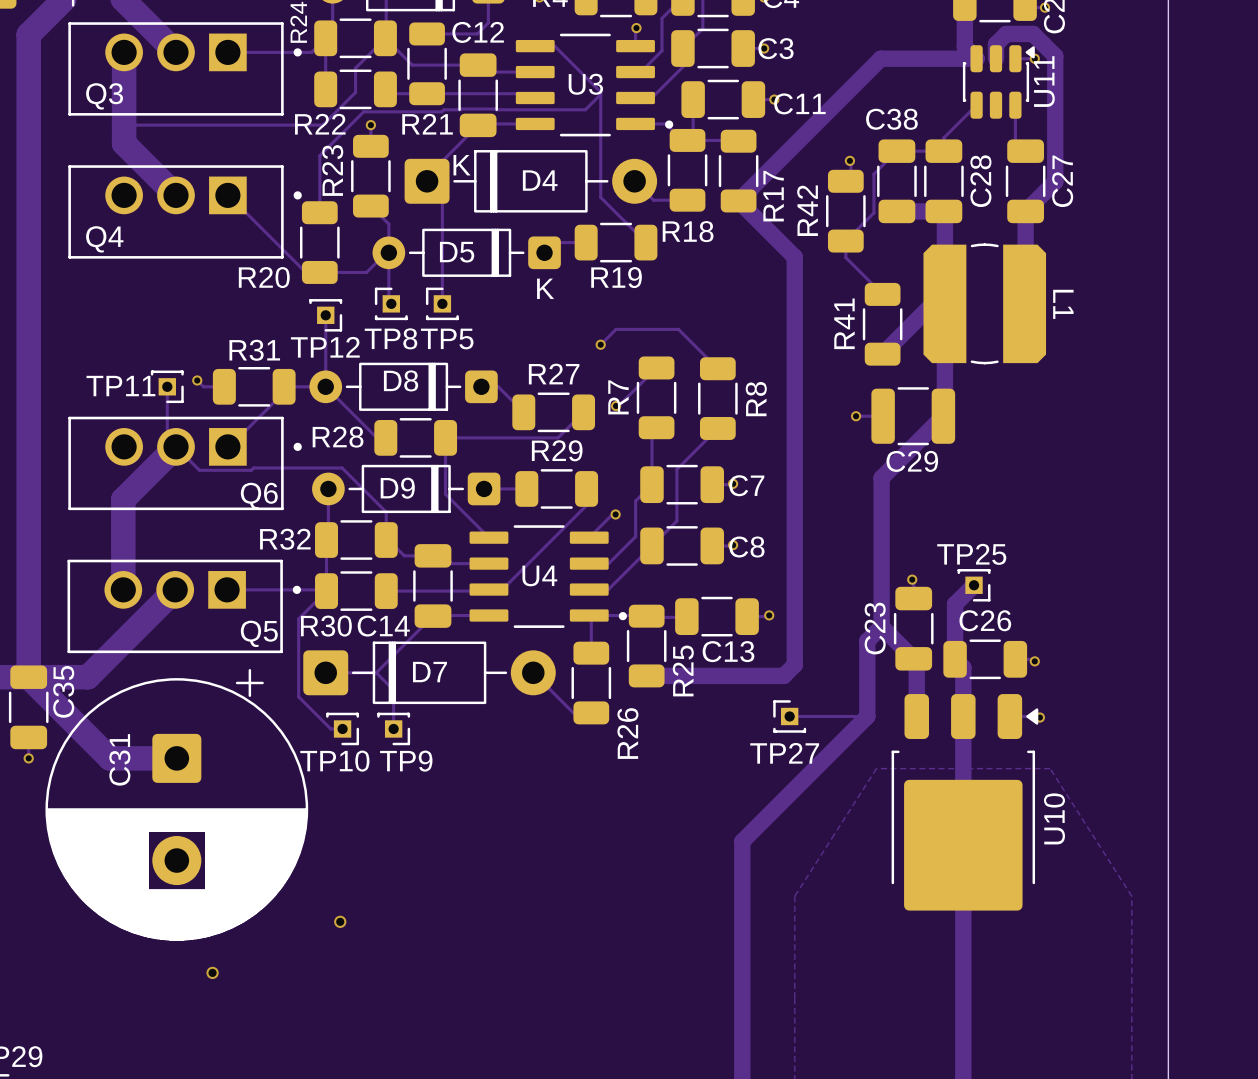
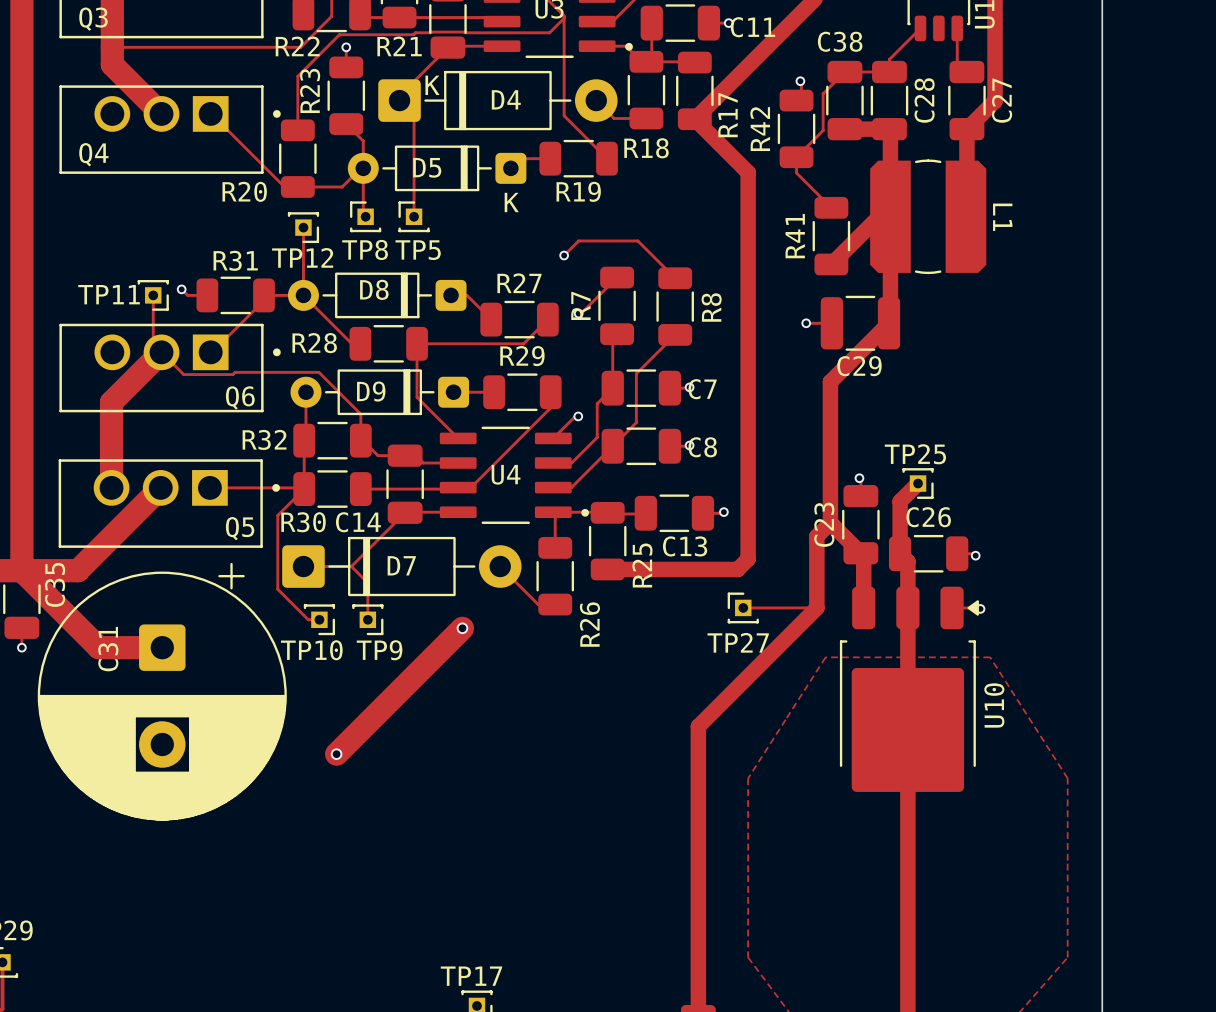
track: none -> (462, 628) (336, 754)
via: none -> (462, 628)
via position: (340, 921) -> (336, 754)
via: (212, 972) -> none

